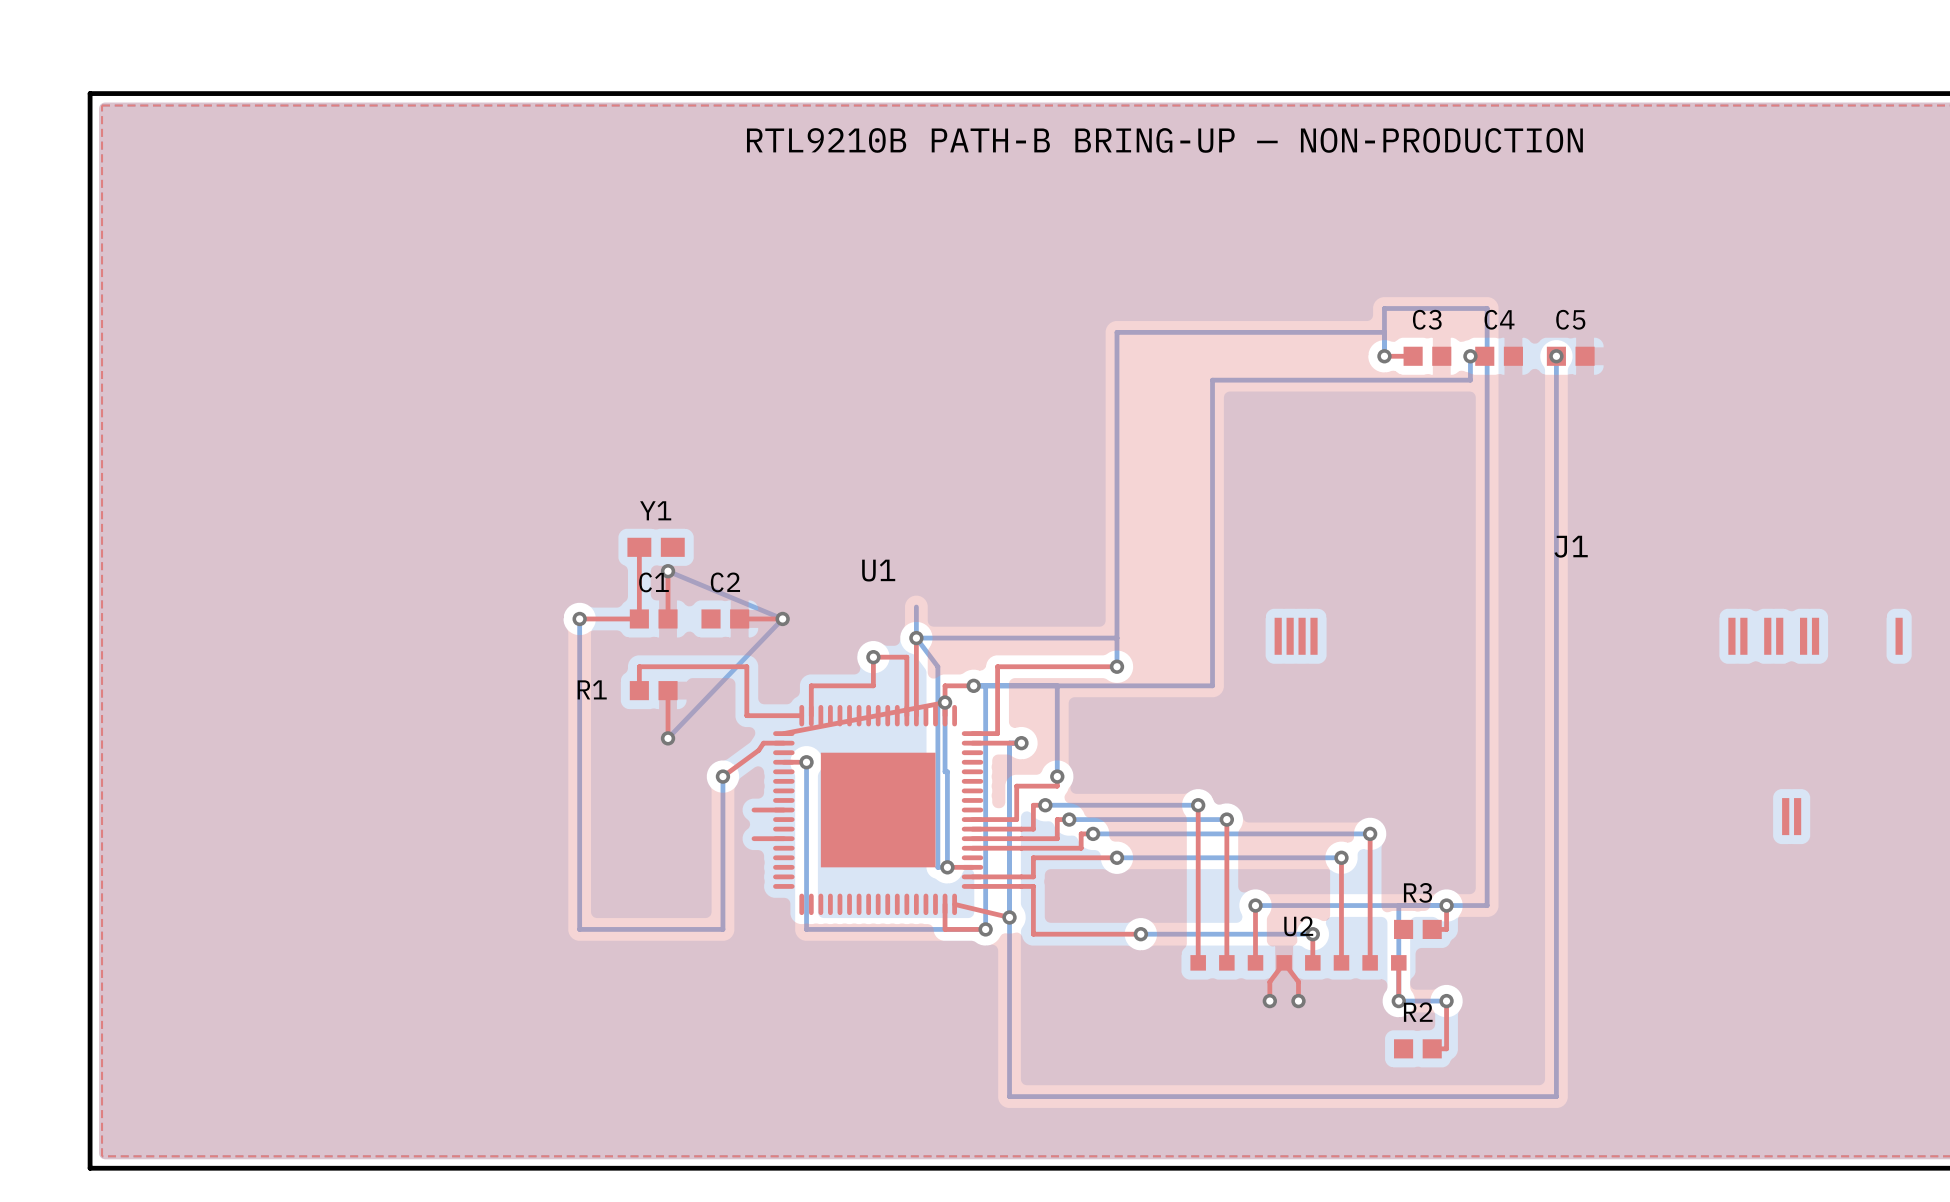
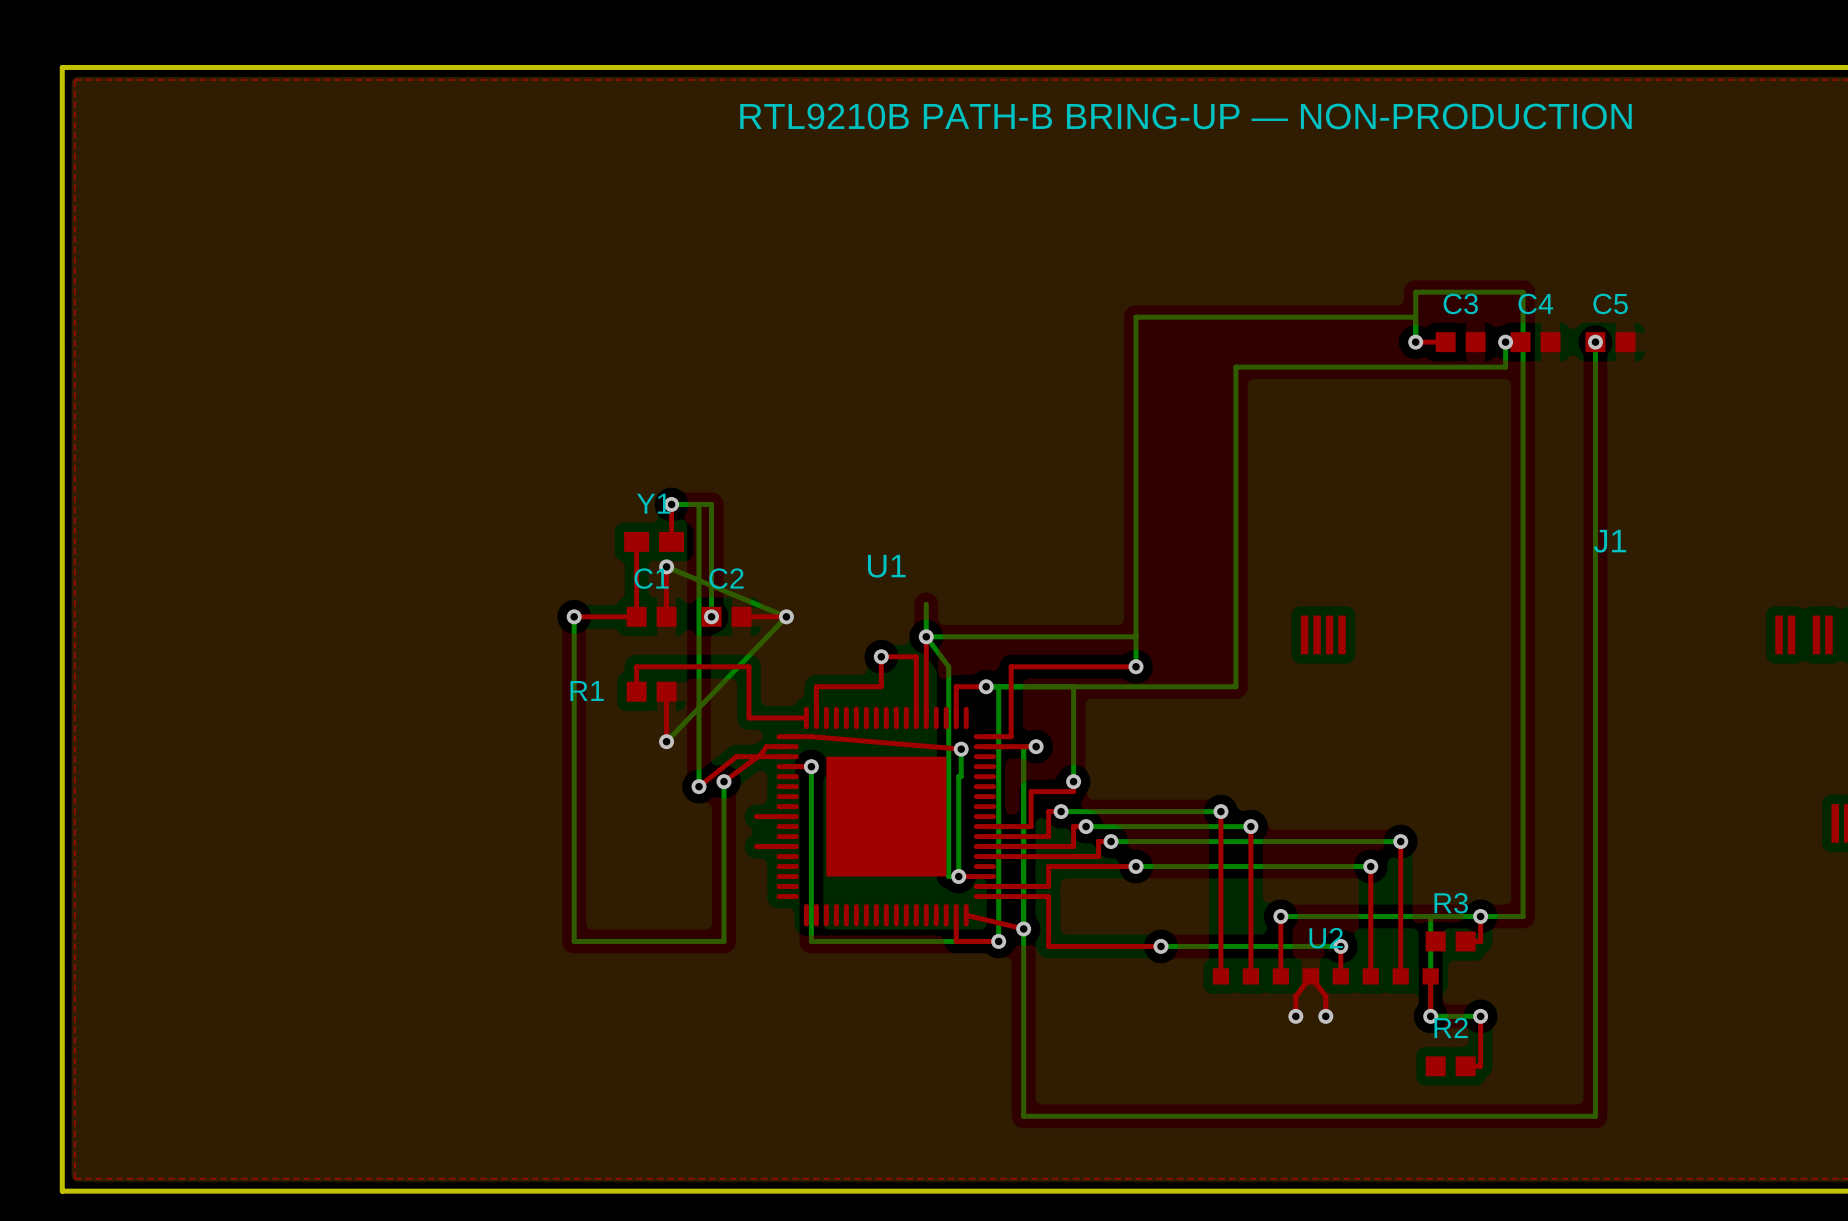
top track: none -> (671, 504) (671, 541)
bottom track: none -> (671, 504) (711, 504) (711, 616)
via: none -> (671, 504)
bottom track: none -> (699, 504) (699, 786)
via: none -> (711, 616)
top track: (945, 702) (783, 733) -> (961, 749) (811, 736) (787, 736)
bottom track: (945, 702) (945, 771) (947, 771) -> (961, 749) (961, 776) (958, 776)
via position: (945, 702) -> (961, 749)
top track: none -> (787, 756) (736, 756) (699, 786)
via: none -> (699, 786)

